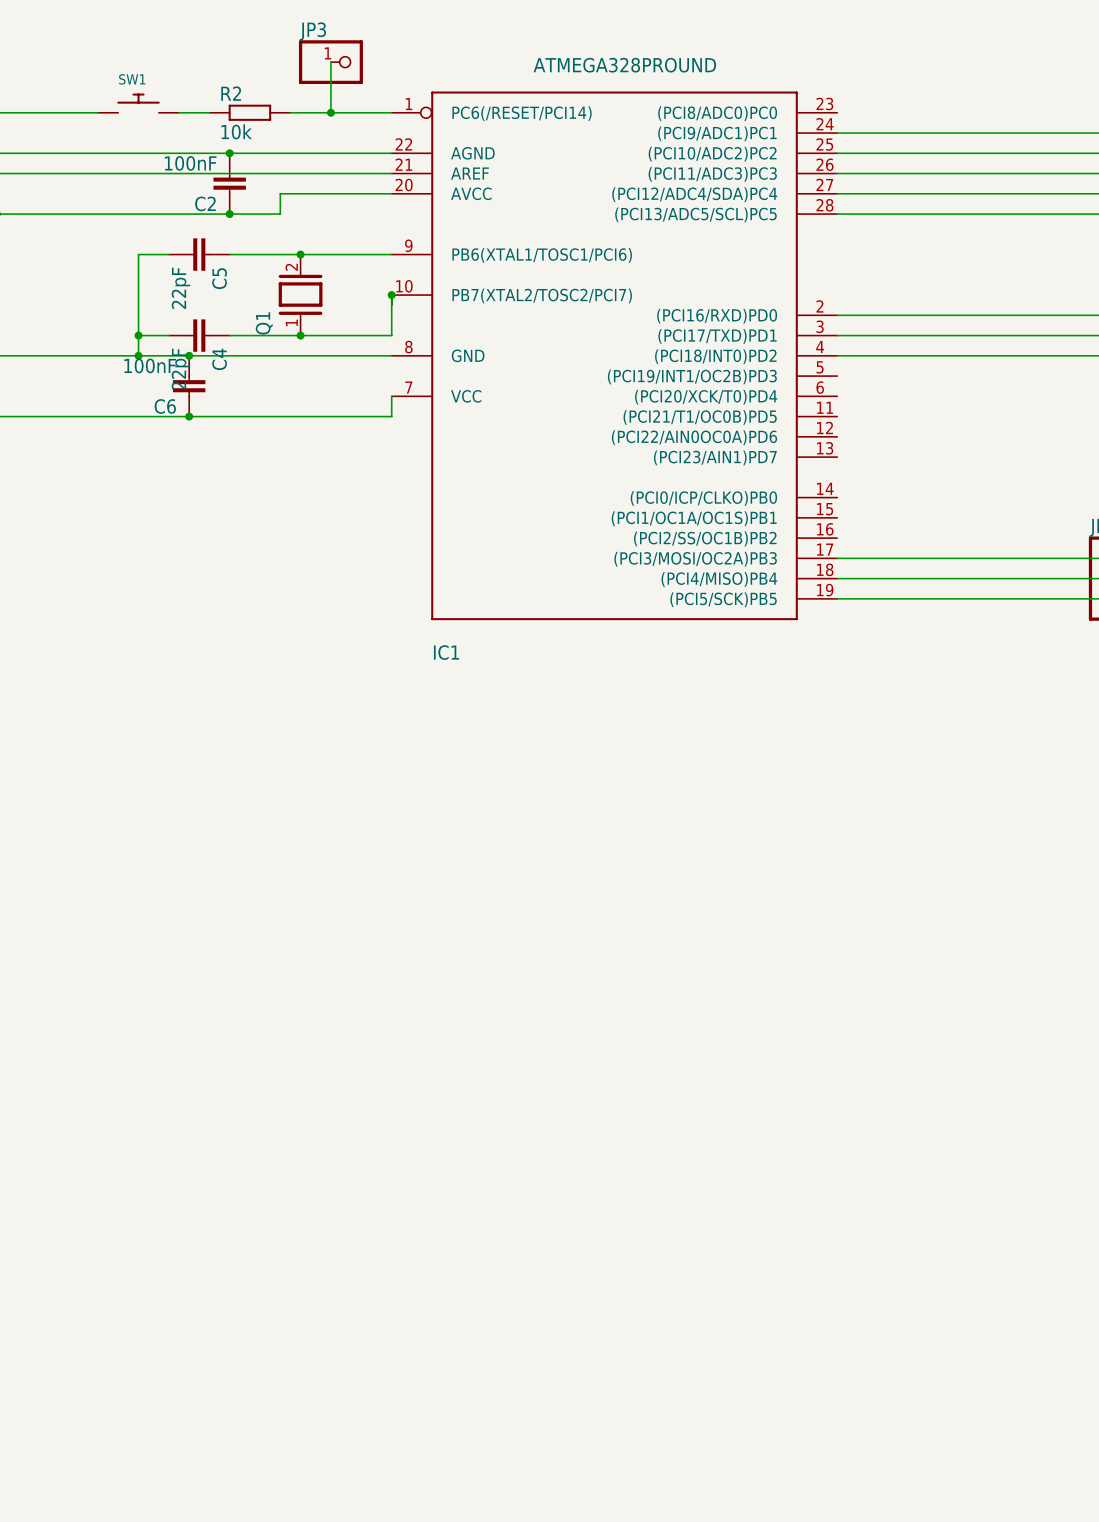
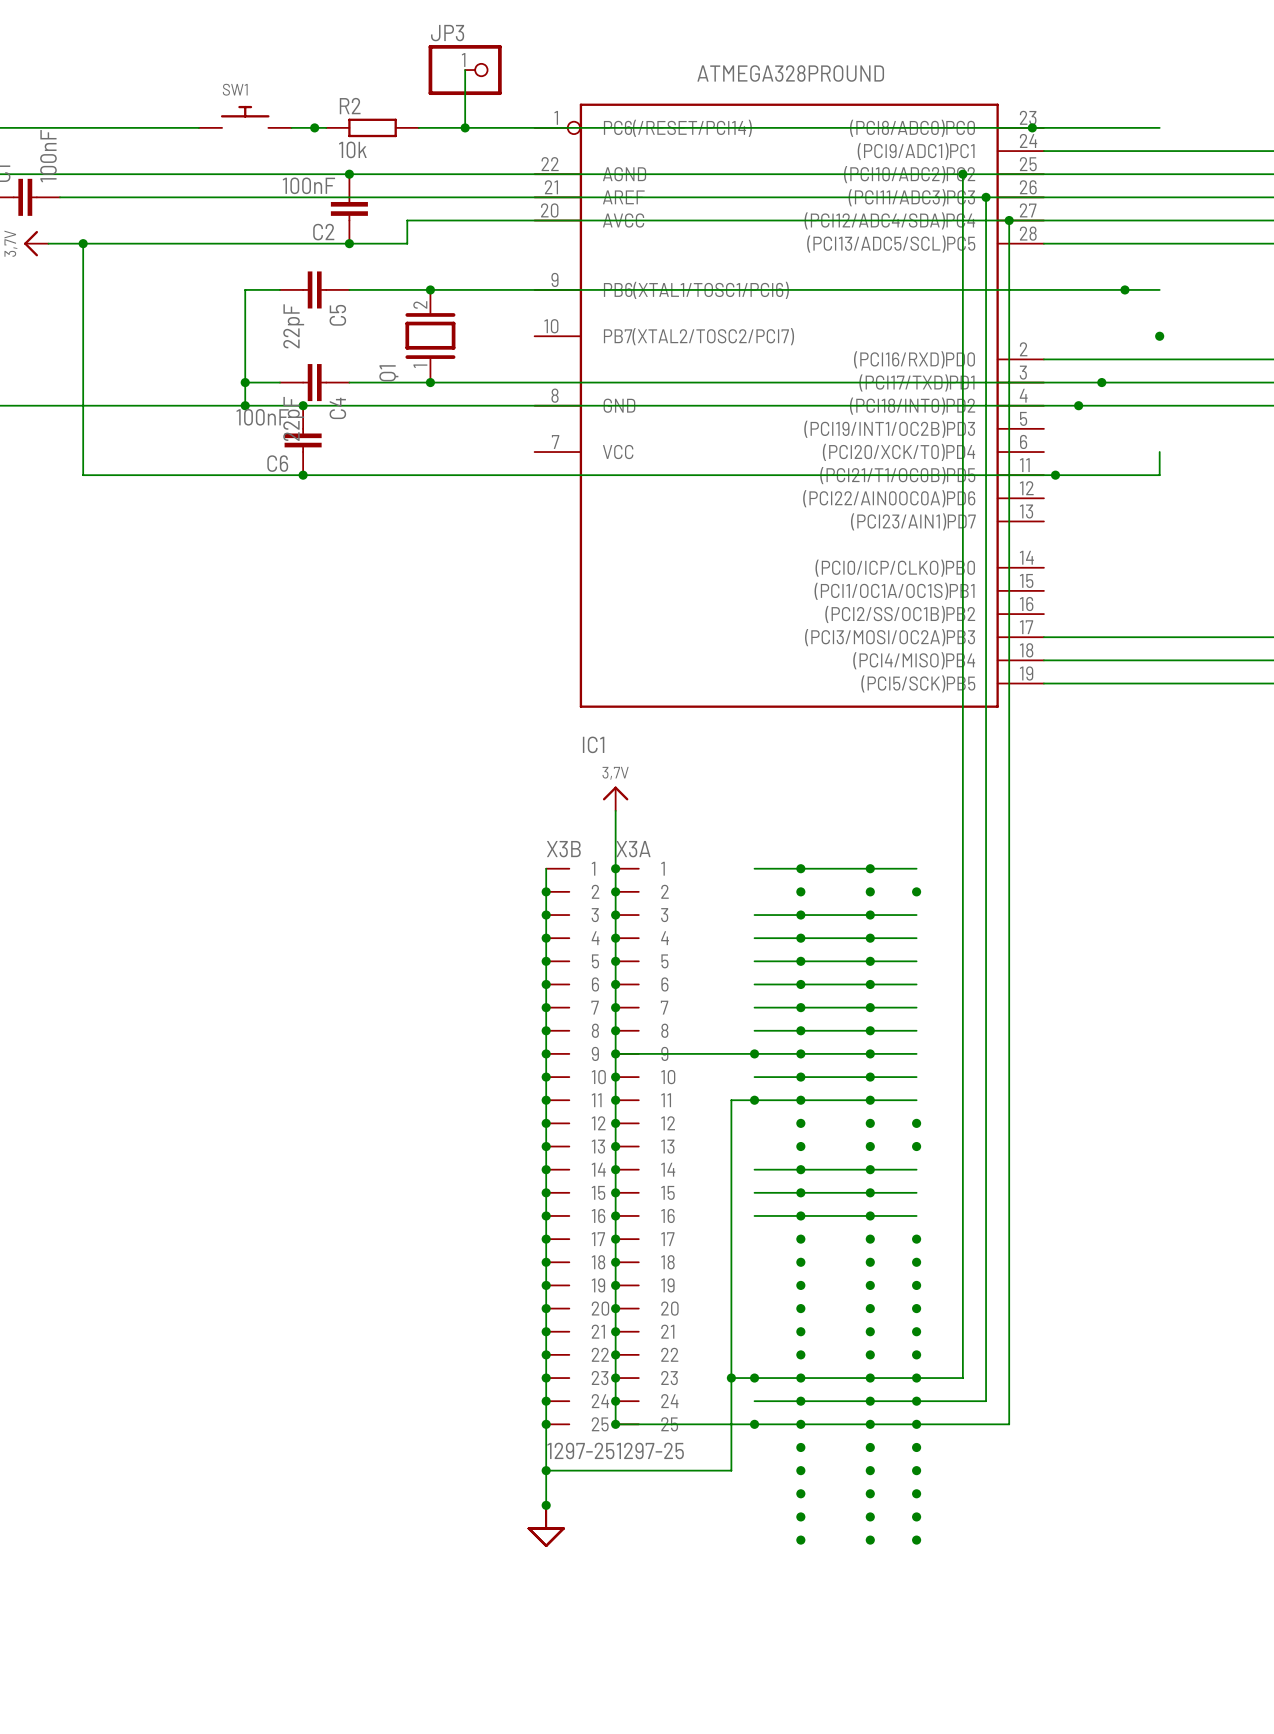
junction: none -> (314, 127)
wire: none -> (534, 127) (1159, 127)
junction: none -> (1032, 127)
wire: none -> (534, 174) (1043, 174)
wire: none -> (962, 174) (962, 1378) (731, 1378)
junction: none -> (962, 174)
wire: none -> (534, 197) (1043, 197)
wire: none -> (986, 197) (986, 1401) (754, 1401)
junction: none -> (986, 197)
wire: none -> (534, 220) (1043, 220)
wire: none -> (1009, 220) (1009, 1424) (615, 1424) (615, 810)
junction: none -> (1009, 220)
wire: none -> (534, 289) (1159, 289)
junction: none -> (1124, 289)
wire: (391, 295) (391, 335) -> (1043, 382) (534, 382)
junction: (391, 295) -> none
junction: none -> (1159, 336)
junction: none -> (1101, 382)
wire: none -> (534, 405) (1043, 405)
junction: none -> (1078, 405)
wire: (391, 396) (391, 416) -> (1159, 452) (1159, 475) (534, 475)
junction: none -> (1055, 475)
power symbol: none -> 3,7V (615, 798)
wire: none -> (546, 868) (546, 1505)
junction: none -> (615, 868)
wire: none -> (754, 868) (916, 868)
junction: none -> (800, 868)
junction: none -> (870, 868)
junction: none -> (546, 891)
junction: none -> (615, 891)
junction: none -> (800, 891)
junction: none -> (870, 891)
junction: none -> (916, 891)
junction: none -> (546, 915)
junction: none -> (615, 915)
wire: none -> (754, 915) (916, 915)
junction: none -> (800, 915)
junction: none -> (870, 915)
junction: none -> (546, 938)
junction: none -> (615, 938)
wire: none -> (754, 938) (916, 938)
junction: none -> (800, 938)
junction: none -> (870, 938)
junction: none -> (546, 961)
junction: none -> (615, 961)
wire: none -> (754, 961) (916, 961)
junction: none -> (800, 961)
junction: none -> (870, 961)
junction: none -> (546, 984)
junction: none -> (615, 984)
wire: none -> (754, 984) (916, 984)
junction: none -> (800, 984)
junction: none -> (870, 984)
junction: none -> (546, 1007)
junction: none -> (615, 1007)
wire: none -> (754, 1007) (916, 1007)
junction: none -> (800, 1007)
junction: none -> (870, 1007)
junction: none -> (546, 1030)
junction: none -> (615, 1030)
wire: none -> (754, 1030) (916, 1030)
junction: none -> (800, 1030)
junction: none -> (870, 1030)
junction: none -> (546, 1053)
wire: none -> (615, 1053) (916, 1053)
junction: none -> (615, 1053)
junction: none -> (754, 1053)
junction: none -> (800, 1053)
junction: none -> (870, 1053)
junction: none -> (546, 1077)
junction: none -> (615, 1077)
wire: none -> (754, 1077) (916, 1077)
junction: none -> (800, 1077)
junction: none -> (870, 1077)
junction: none -> (546, 1100)
junction: none -> (615, 1100)
junction: none -> (754, 1100)
junction: none -> (800, 1100)
junction: none -> (870, 1100)
wire: none -> (916, 1100) (731, 1100) (731, 1470) (546, 1470)
junction: none -> (546, 1123)
junction: none -> (615, 1123)
junction: none -> (800, 1123)
junction: none -> (870, 1123)
junction: none -> (916, 1123)
junction: none -> (546, 1146)
X3B: none -> 1297-25 (557, 1146)
junction: none -> (615, 1146)
X3A: none -> 1297-25 (627, 1146)
junction: none -> (800, 1146)
junction: none -> (870, 1146)
junction: none -> (916, 1146)
junction: none -> (546, 1169)
junction: none -> (615, 1169)
wire: none -> (754, 1169) (916, 1169)
junction: none -> (800, 1169)
junction: none -> (870, 1169)
junction: none -> (546, 1192)
junction: none -> (615, 1192)
wire: none -> (754, 1192) (916, 1192)
junction: none -> (800, 1192)
junction: none -> (870, 1192)
junction: none -> (546, 1215)
junction: none -> (615, 1215)
wire: none -> (754, 1215) (916, 1215)
junction: none -> (800, 1215)
junction: none -> (870, 1215)
junction: none -> (546, 1239)
junction: none -> (615, 1239)
junction: none -> (800, 1239)
junction: none -> (870, 1239)
junction: none -> (916, 1239)
junction: none -> (546, 1262)
junction: none -> (615, 1262)
junction: none -> (800, 1262)
junction: none -> (870, 1262)
junction: none -> (916, 1262)
junction: none -> (546, 1285)
junction: none -> (615, 1285)
junction: none -> (800, 1285)
junction: none -> (870, 1285)
junction: none -> (916, 1285)
junction: none -> (546, 1308)
junction: none -> (615, 1308)
junction: none -> (800, 1308)
junction: none -> (870, 1308)
junction: none -> (916, 1308)
junction: none -> (546, 1331)
junction: none -> (615, 1331)
junction: none -> (800, 1331)
junction: none -> (870, 1331)
junction: none -> (916, 1331)
junction: none -> (546, 1354)
junction: none -> (615, 1354)
junction: none -> (800, 1354)
junction: none -> (870, 1354)
junction: none -> (916, 1354)
junction: none -> (546, 1378)
junction: none -> (615, 1378)
junction: none -> (731, 1378)
junction: none -> (754, 1378)
junction: none -> (800, 1378)
junction: none -> (870, 1378)
junction: none -> (916, 1378)
junction: none -> (546, 1401)
junction: none -> (615, 1401)
junction: none -> (800, 1401)
junction: none -> (870, 1401)
junction: none -> (916, 1401)
junction: none -> (546, 1424)
junction: none -> (615, 1424)
junction: none -> (754, 1424)
junction: none -> (800, 1424)
junction: none -> (870, 1424)
junction: none -> (916, 1424)
junction: none -> (800, 1447)
junction: none -> (870, 1447)
junction: none -> (916, 1447)
junction: none -> (546, 1470)
junction: none -> (800, 1470)
junction: none -> (870, 1470)
junction: none -> (916, 1470)
junction: none -> (800, 1493)
junction: none -> (870, 1493)
junction: none -> (916, 1493)
junction: none -> (546, 1505)
junction: none -> (800, 1516)
junction: none -> (870, 1516)
junction: none -> (916, 1516)
power symbol: none -> (546, 1526)
junction: none -> (800, 1540)
junction: none -> (870, 1540)
junction: none -> (916, 1540)

